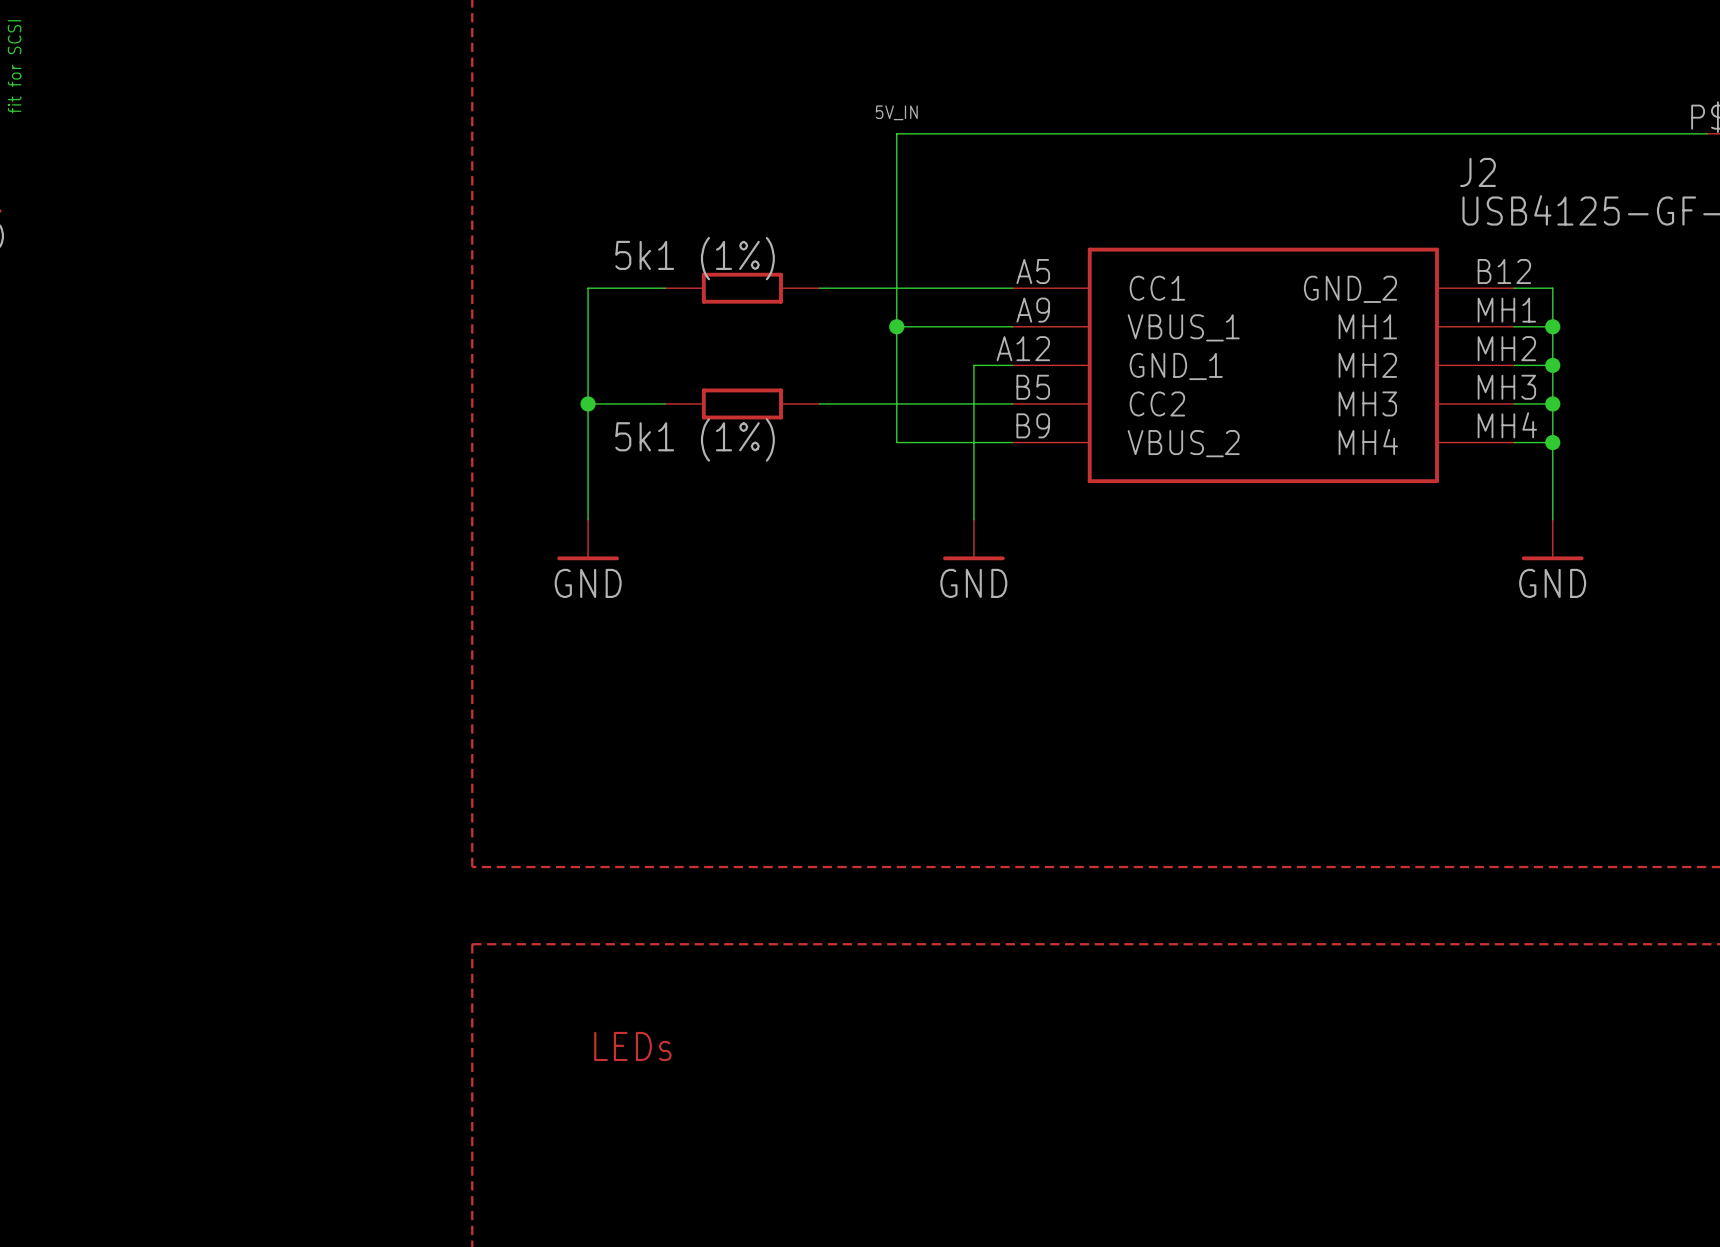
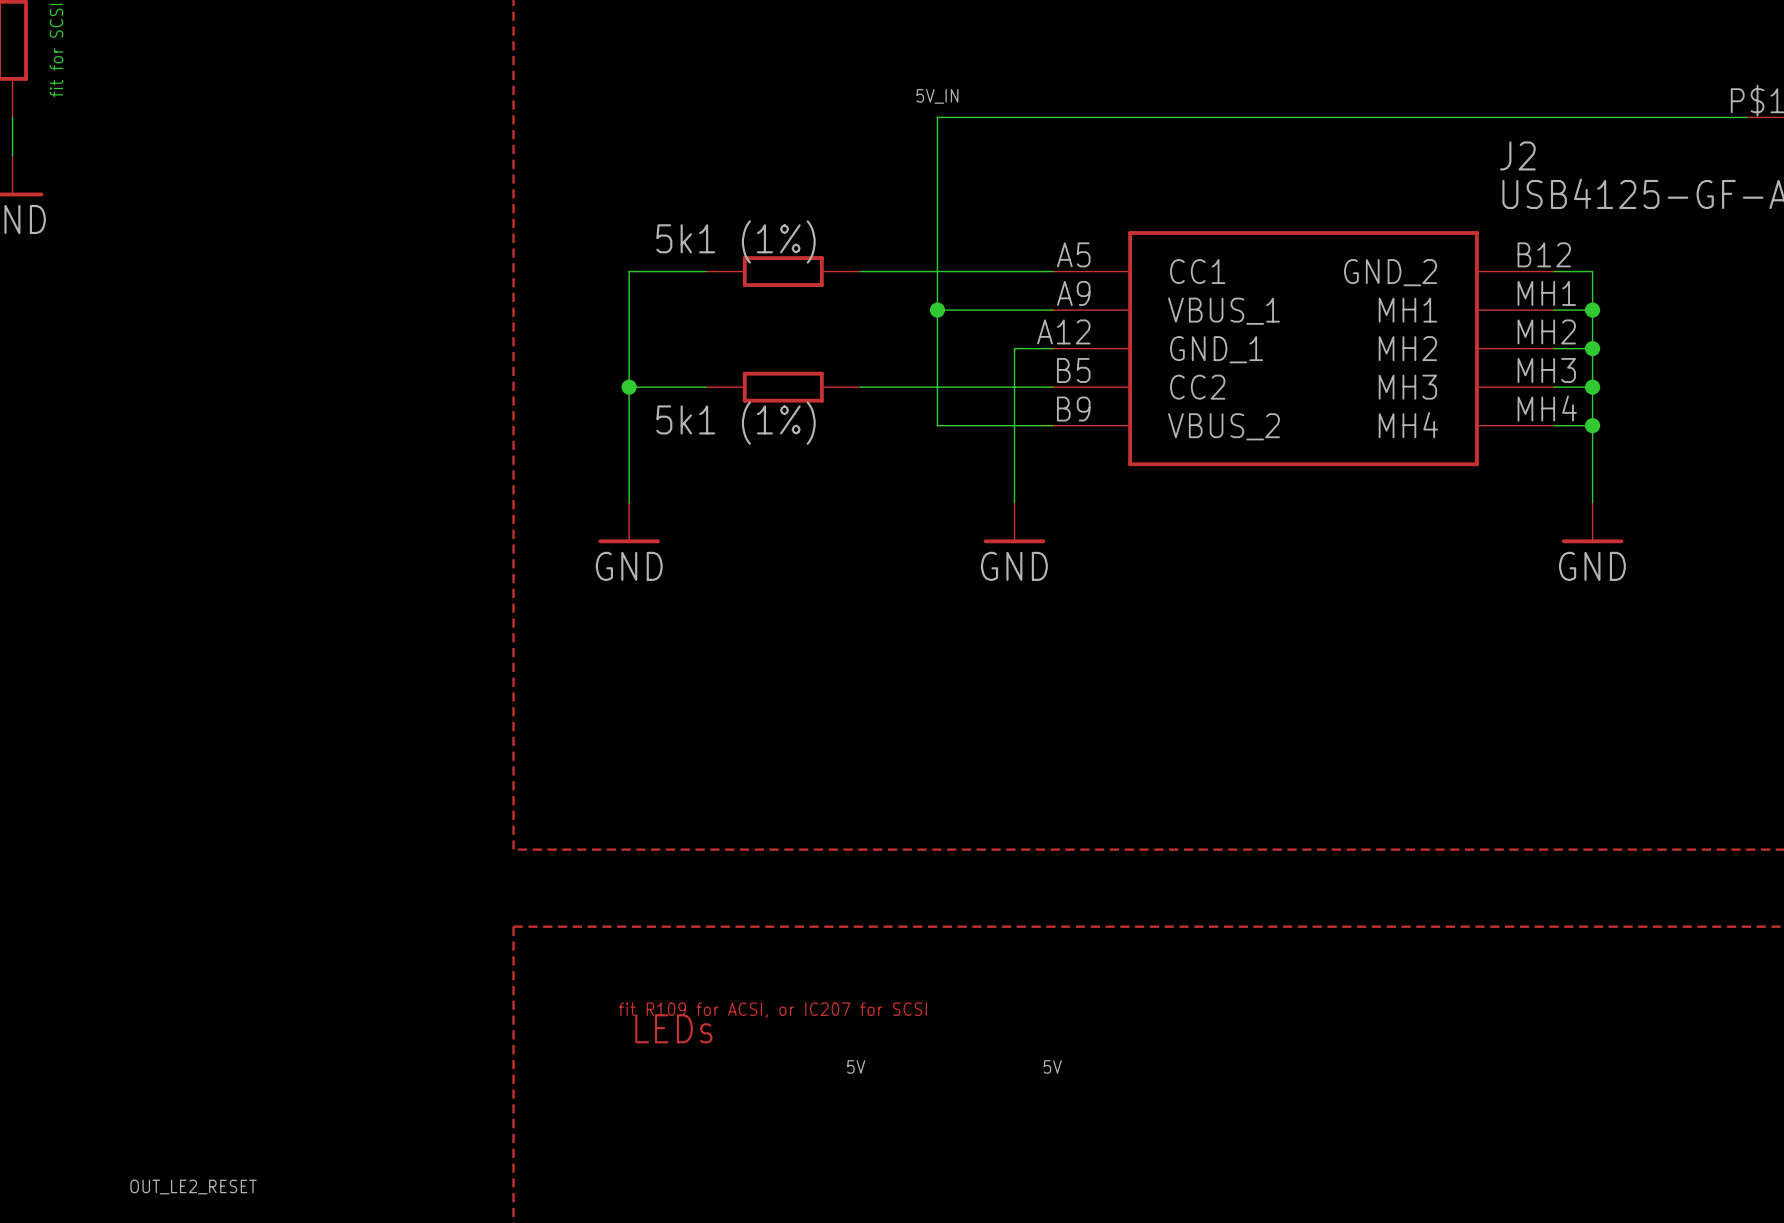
text: none -> fit R109 for ACSI, or IC207 for SCSI (772, 1010)
label: none -> 5V (856, 1066)
label: none -> 5V (1052, 1066)
label: none -> OUT_LE2_RESET (193, 1187)

